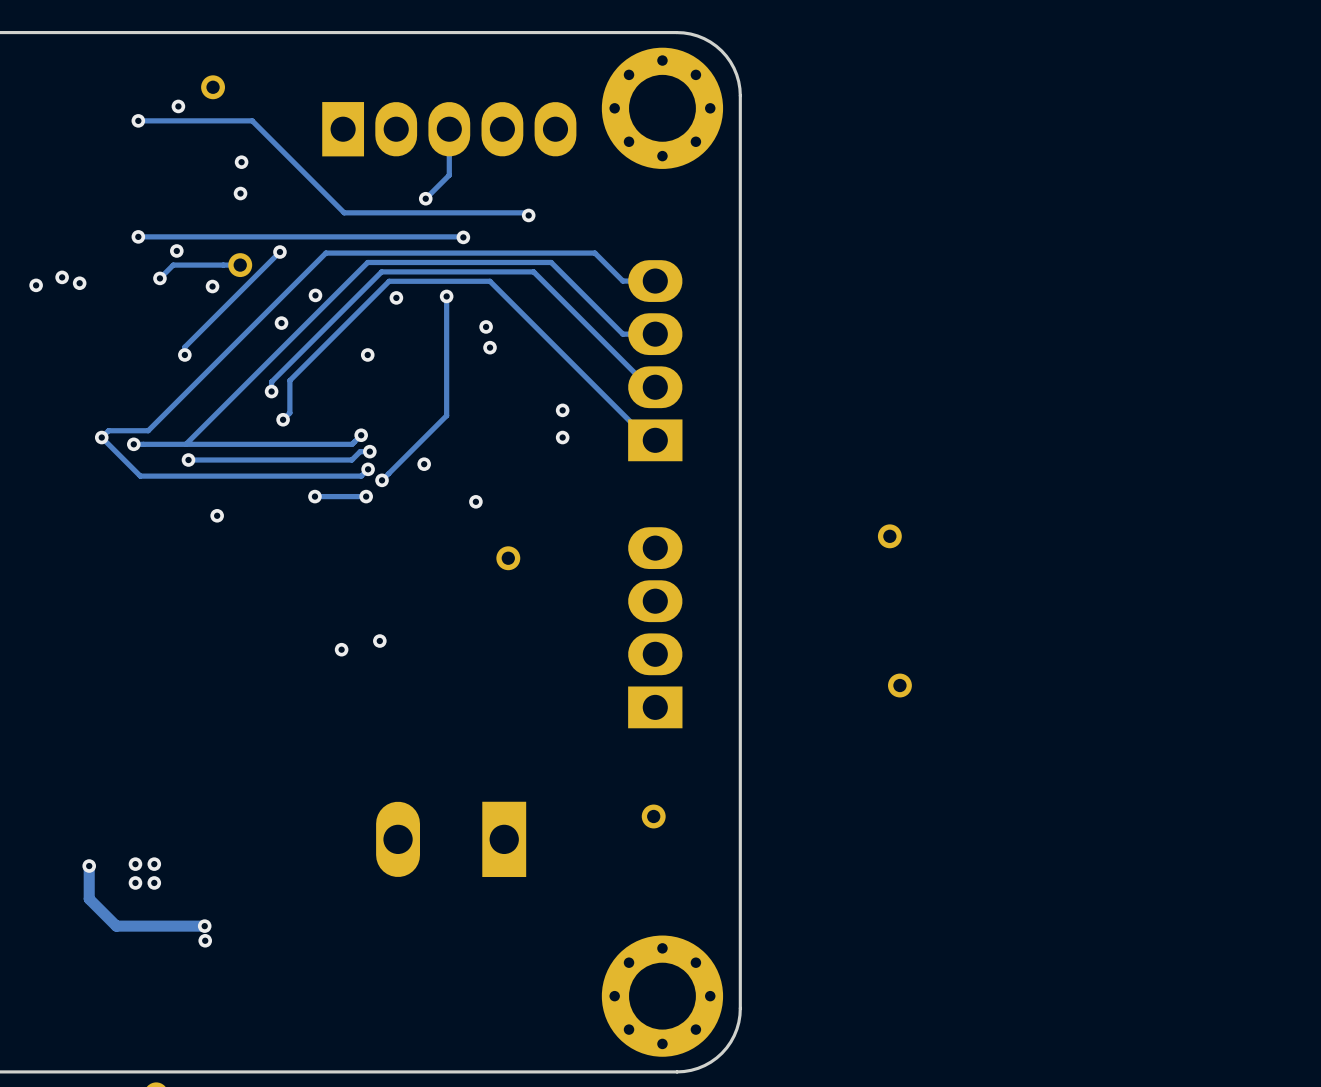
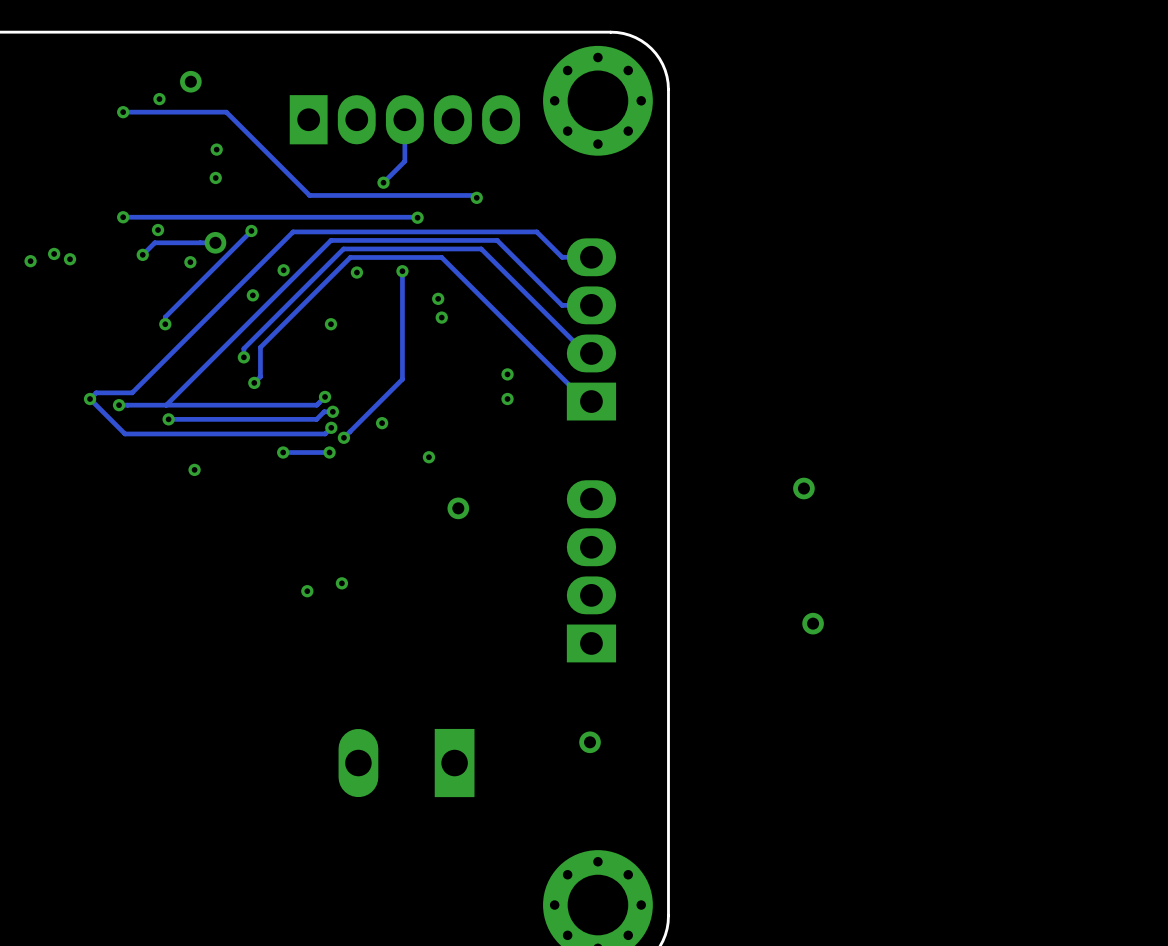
via: (135, 864) -> none
via: (154, 864) -> none
track: (89, 866) (89, 898) (116, 926) (204, 926) -> none
via: (89, 866) -> none
via: (135, 882) -> none
via: (154, 882) -> none
via: (204, 926) -> none
via: (205, 940) -> none

